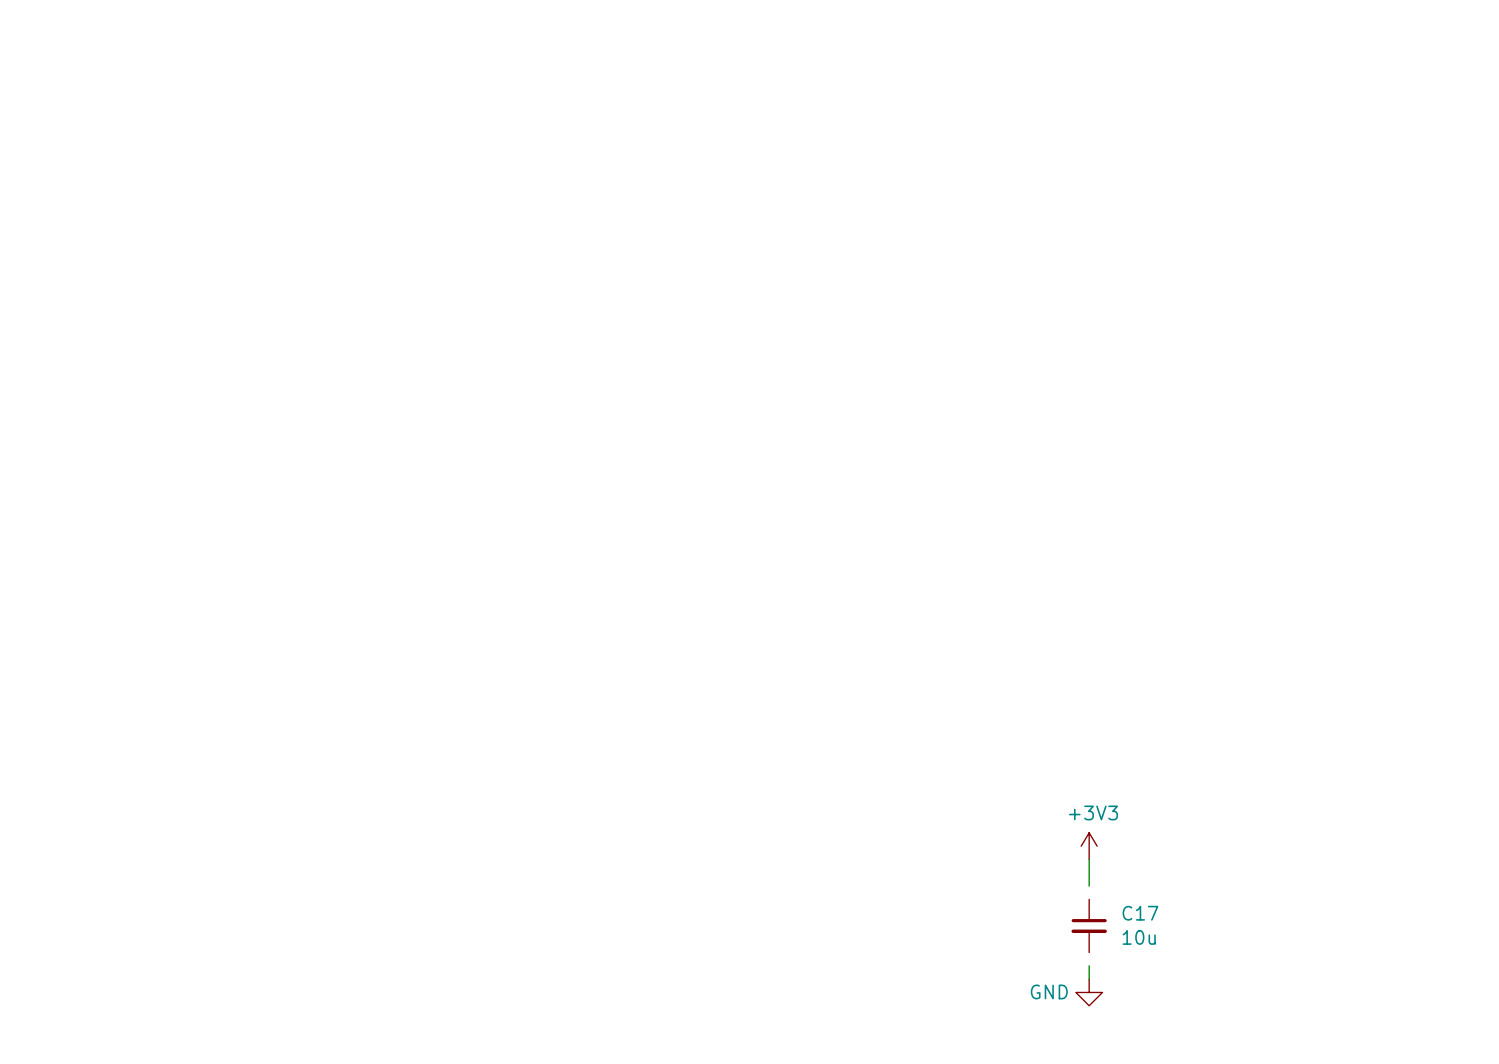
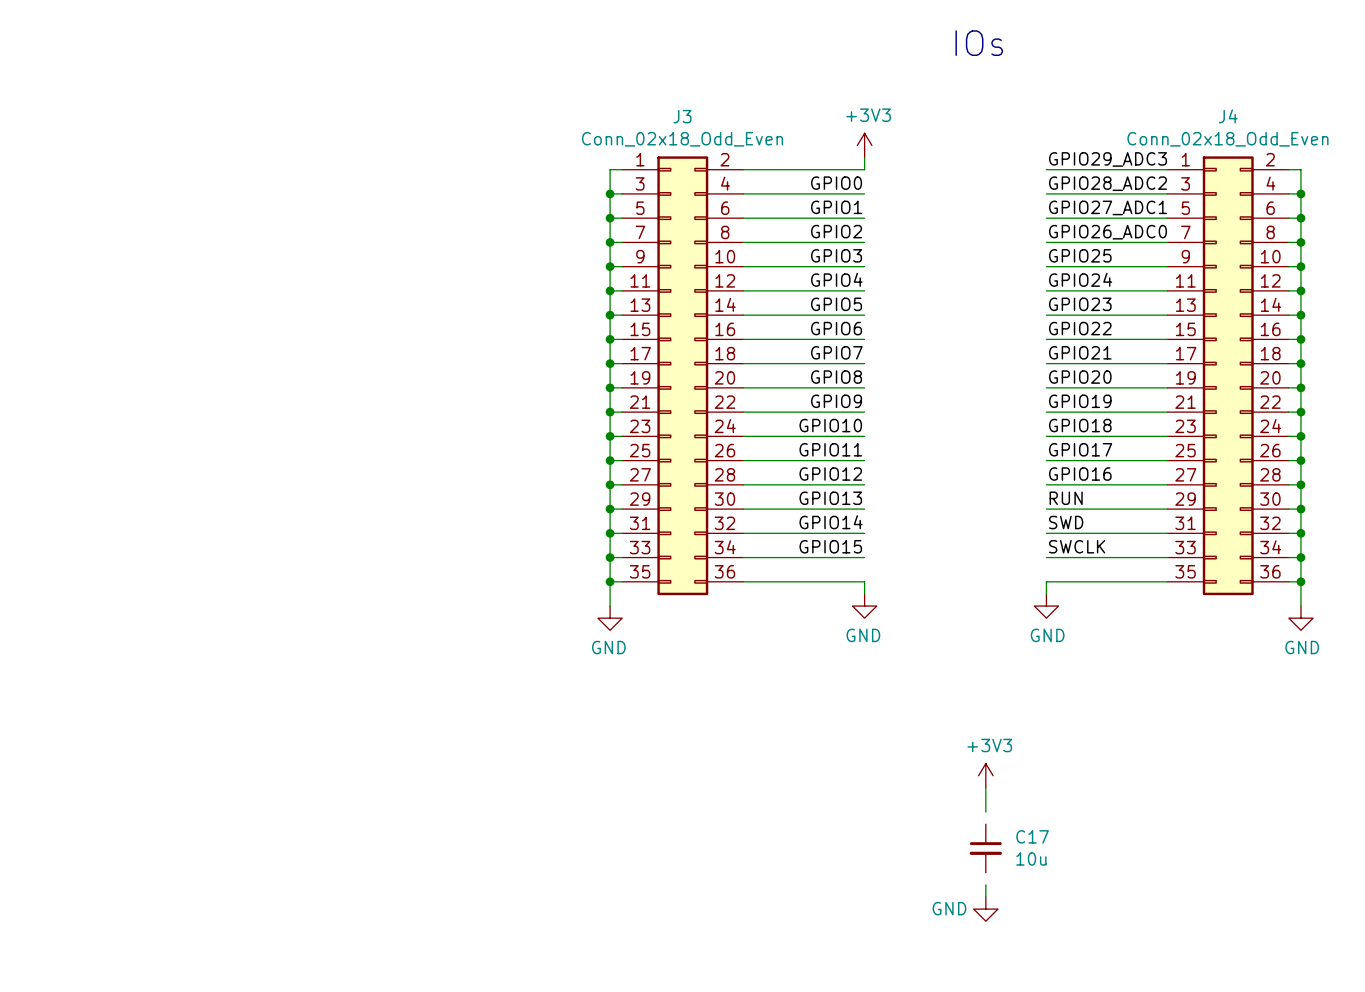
text: none -> IOs (979, 43)
power symbol: none -> +3V3 (864, 145)
wire: none -> (864, 157) (864, 169) (743, 169)
label: none -> GPIO29_ADC3 (1107, 159)
wire: none -> (622, 169) (610, 169) (610, 606)
wire: none -> (1046, 169) (1167, 169)
wire: none -> (1288, 169) (1300, 169) (1300, 606)
label: none -> GPIO0 (836, 183)
label: none -> GPIO28_ADC2 (1107, 183)
wire: none -> (610, 193) (622, 193)
junction: none -> (610, 193)
wire: none -> (743, 193) (864, 193)
wire: none -> (1046, 193) (1167, 193)
wire: none -> (1288, 193) (1300, 193)
junction: none -> (1300, 193)
label: none -> GPIO1 (836, 207)
label: none -> GPIO27_ADC1 (1107, 207)
wire: none -> (610, 218) (622, 218)
junction: none -> (610, 218)
wire: none -> (743, 218) (864, 218)
wire: none -> (1046, 218) (1167, 218)
wire: none -> (1288, 218) (1300, 218)
junction: none -> (1300, 218)
label: none -> GPIO2 (836, 231)
label: none -> GPIO26_ADC0 (1107, 232)
wire: none -> (610, 242) (622, 242)
junction: none -> (610, 242)
wire: none -> (743, 242) (864, 242)
wire: none -> (1046, 242) (1167, 242)
wire: none -> (1288, 242) (1300, 242)
junction: none -> (1300, 242)
label: none -> GPIO3 (836, 255)
label: none -> GPIO25 (1080, 255)
wire: none -> (610, 266) (622, 266)
junction: none -> (610, 266)
wire: none -> (743, 266) (864, 266)
wire: none -> (1046, 266) (1167, 266)
wire: none -> (1288, 266) (1300, 266)
junction: none -> (1300, 266)
label: none -> GPIO4 (836, 279)
label: none -> GPIO24 (1080, 279)
wire: none -> (610, 290) (622, 290)
junction: none -> (610, 290)
wire: none -> (743, 290) (864, 290)
wire: none -> (1046, 290) (1167, 290)
wire: none -> (1288, 290) (1300, 290)
junction: none -> (1300, 290)
label: none -> GPIO5 (836, 304)
label: none -> GPIO23 (1080, 304)
wire: none -> (610, 315) (622, 315)
junction: none -> (610, 315)
wire: none -> (743, 315) (864, 315)
wire: none -> (1046, 315) (1167, 315)
wire: none -> (1288, 315) (1300, 315)
junction: none -> (1300, 315)
label: none -> GPIO6 (836, 328)
label: none -> GPIO22 (1080, 328)
wire: none -> (610, 339) (622, 339)
junction: none -> (610, 339)
wire: none -> (743, 339) (864, 339)
wire: none -> (1046, 339) (1167, 339)
wire: none -> (1288, 339) (1300, 339)
junction: none -> (1300, 339)
label: none -> GPIO7 (836, 352)
label: none -> GPIO21 (1080, 352)
wire: none -> (610, 363) (622, 363)
junction: none -> (610, 363)
wire: none -> (743, 363) (864, 363)
wire: none -> (1046, 363) (1167, 363)
wire: none -> (1288, 363) (1300, 363)
junction: none -> (1300, 363)
J3: none -> Conn_02x18_Odd_Even (682, 375)
J4: none -> Conn_02x18_Odd_Even (1228, 375)
label: none -> GPIO8 (836, 377)
label: none -> GPIO20 (1080, 377)
wire: none -> (610, 387) (622, 387)
junction: none -> (610, 387)
wire: none -> (743, 387) (864, 387)
wire: none -> (1046, 387) (1167, 387)
wire: none -> (1288, 387) (1300, 387)
junction: none -> (1300, 387)
label: none -> GPIO9 (836, 401)
label: none -> GPIO19 (1080, 401)
wire: none -> (610, 412) (622, 412)
junction: none -> (610, 412)
wire: none -> (743, 412) (864, 412)
wire: none -> (1046, 412) (1167, 412)
wire: none -> (1288, 412) (1300, 412)
junction: none -> (1300, 412)
label: none -> GPIO10 (830, 425)
label: none -> GPIO18 (1080, 425)
wire: none -> (610, 436) (622, 436)
junction: none -> (610, 436)
wire: none -> (743, 436) (864, 436)
wire: none -> (1046, 436) (1167, 436)
wire: none -> (1288, 436) (1300, 436)
junction: none -> (1300, 436)
label: none -> GPIO11 (830, 449)
label: none -> GPIO17 (1080, 449)
wire: none -> (610, 460) (622, 460)
junction: none -> (610, 460)
wire: none -> (743, 460) (864, 460)
wire: none -> (1046, 460) (1167, 460)
wire: none -> (1288, 460) (1300, 460)
junction: none -> (1300, 460)
label: none -> GPIO12 (830, 474)
label: none -> GPIO16 (1080, 474)
wire: none -> (610, 484) (622, 484)
junction: none -> (610, 484)
wire: none -> (743, 484) (864, 484)
wire: none -> (1046, 484) (1167, 484)
wire: none -> (1288, 484) (1300, 484)
junction: none -> (1300, 484)
label: none -> GPIO13 (830, 498)
label: none -> RUN (1066, 498)
wire: none -> (610, 509) (622, 509)
junction: none -> (610, 509)
wire: none -> (743, 509) (864, 509)
wire: none -> (1046, 509) (1167, 509)
wire: none -> (1288, 509) (1300, 509)
junction: none -> (1300, 509)
label: none -> GPIO14 (831, 522)
label: none -> SWD (1066, 522)
wire: none -> (610, 533) (622, 533)
junction: none -> (610, 533)
wire: none -> (743, 533) (864, 533)
wire: none -> (1046, 533) (1167, 533)
wire: none -> (1288, 533) (1300, 533)
junction: none -> (1300, 533)
label: none -> GPIO15 (830, 546)
label: none -> SWCLK (1077, 546)
wire: none -> (610, 557) (622, 557)
junction: none -> (610, 557)
wire: none -> (743, 557) (864, 557)
wire: none -> (1046, 557) (1167, 557)
wire: none -> (1288, 557) (1300, 557)
junction: none -> (1300, 557)
wire: none -> (610, 581) (622, 581)
junction: none -> (610, 581)
wire: none -> (743, 581) (864, 581) (864, 593)
wire: none -> (1167, 581) (1046, 581) (1046, 593)
wire: none -> (1288, 581) (1300, 581)
junction: none -> (1300, 581)
power symbol: none -> GND (864, 606)
power symbol: none -> GND (1046, 606)
power symbol: none -> GND (610, 618)
power symbol: none -> GND (1300, 618)

